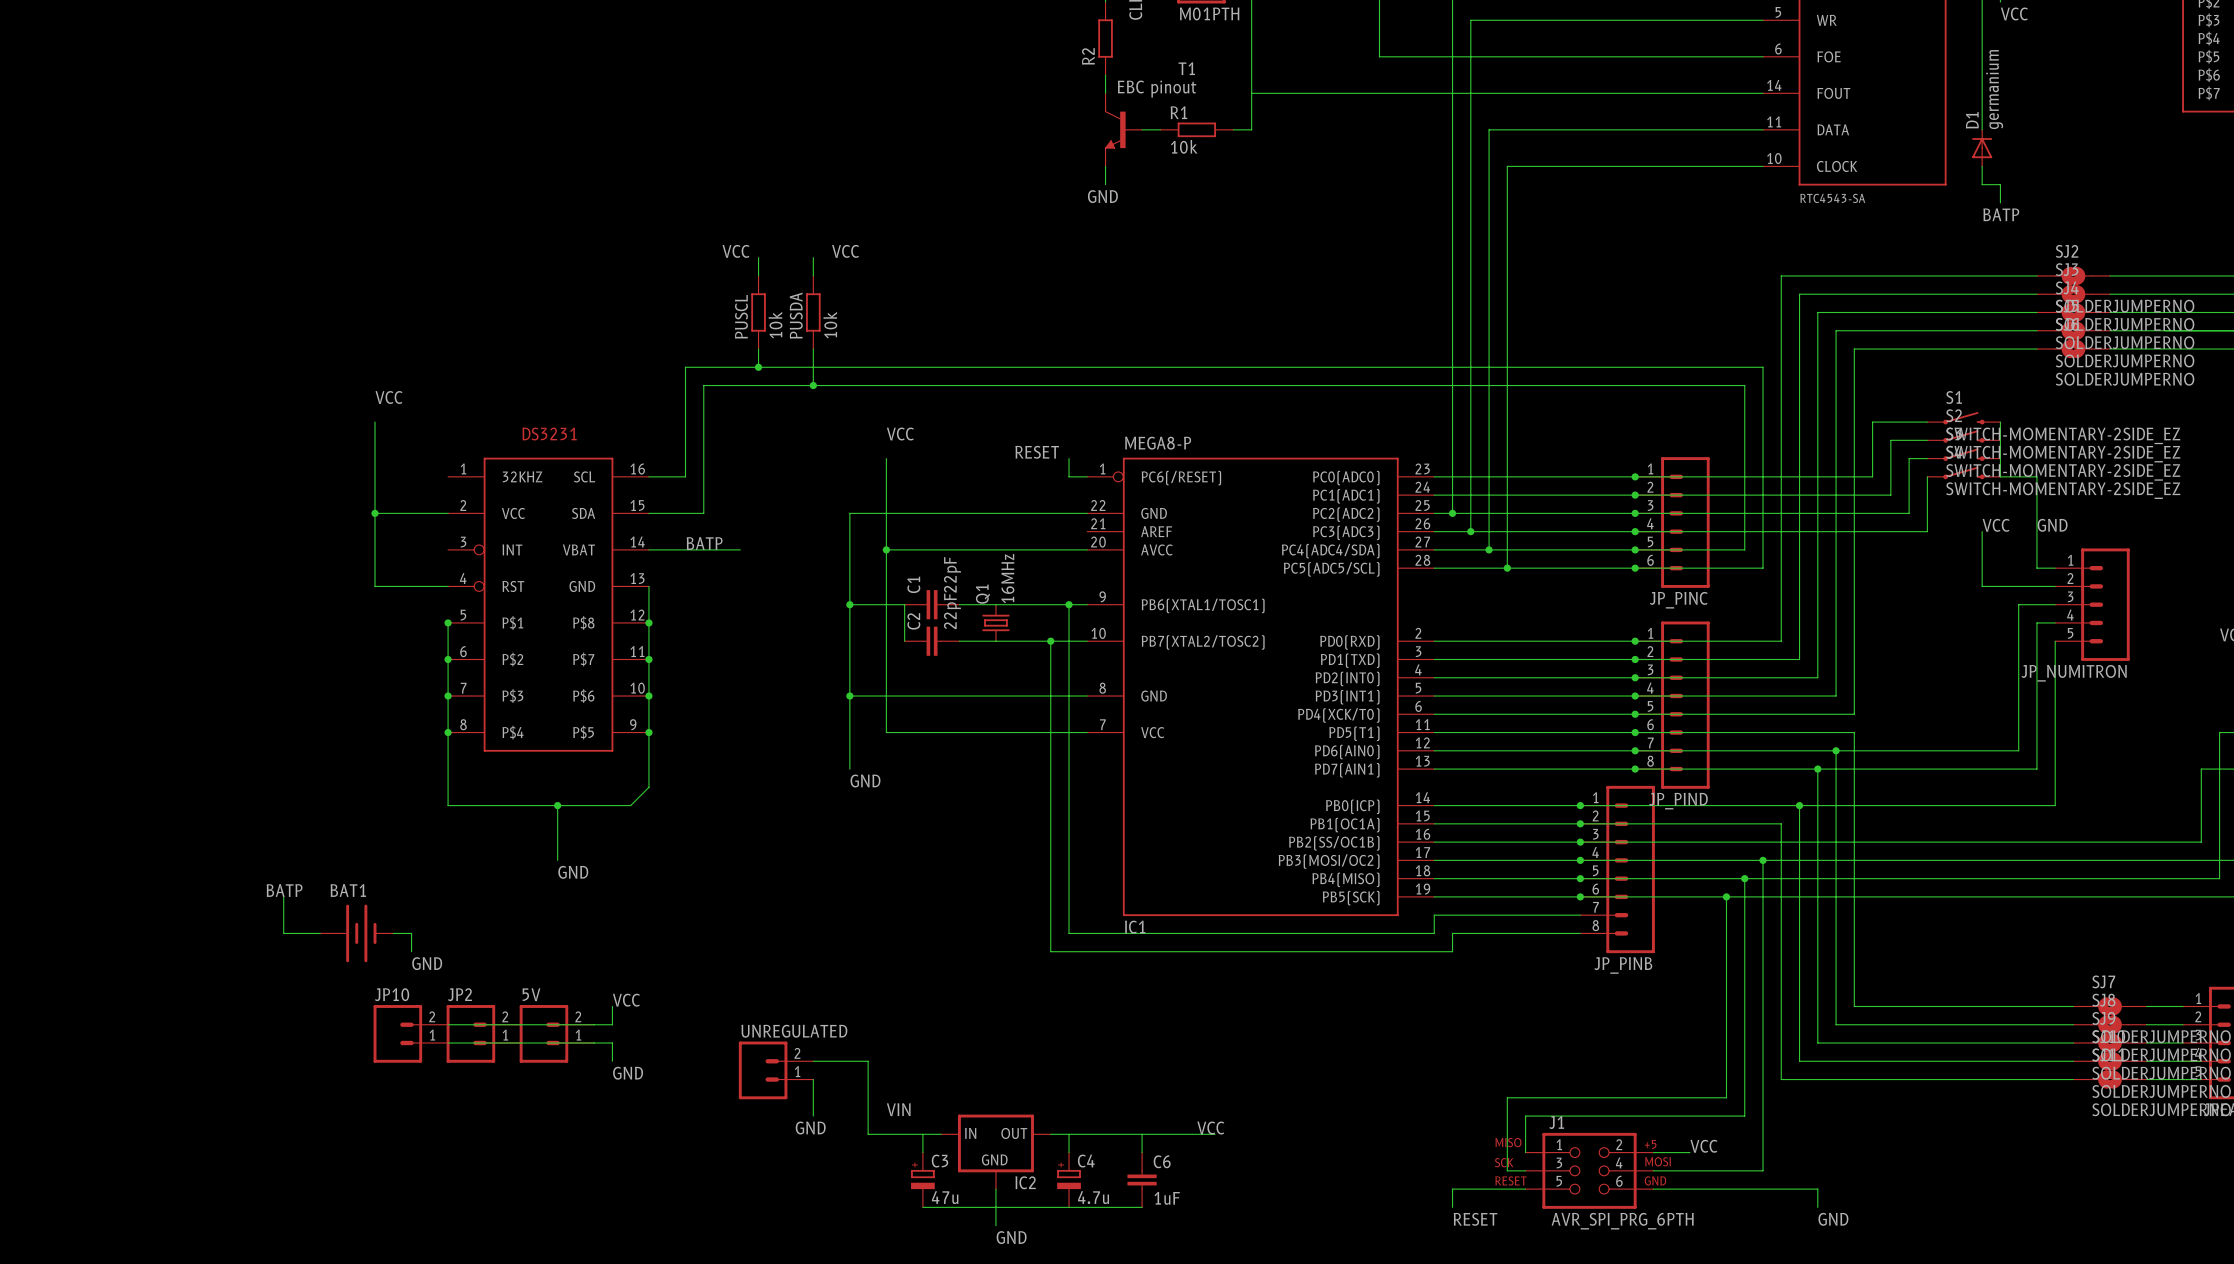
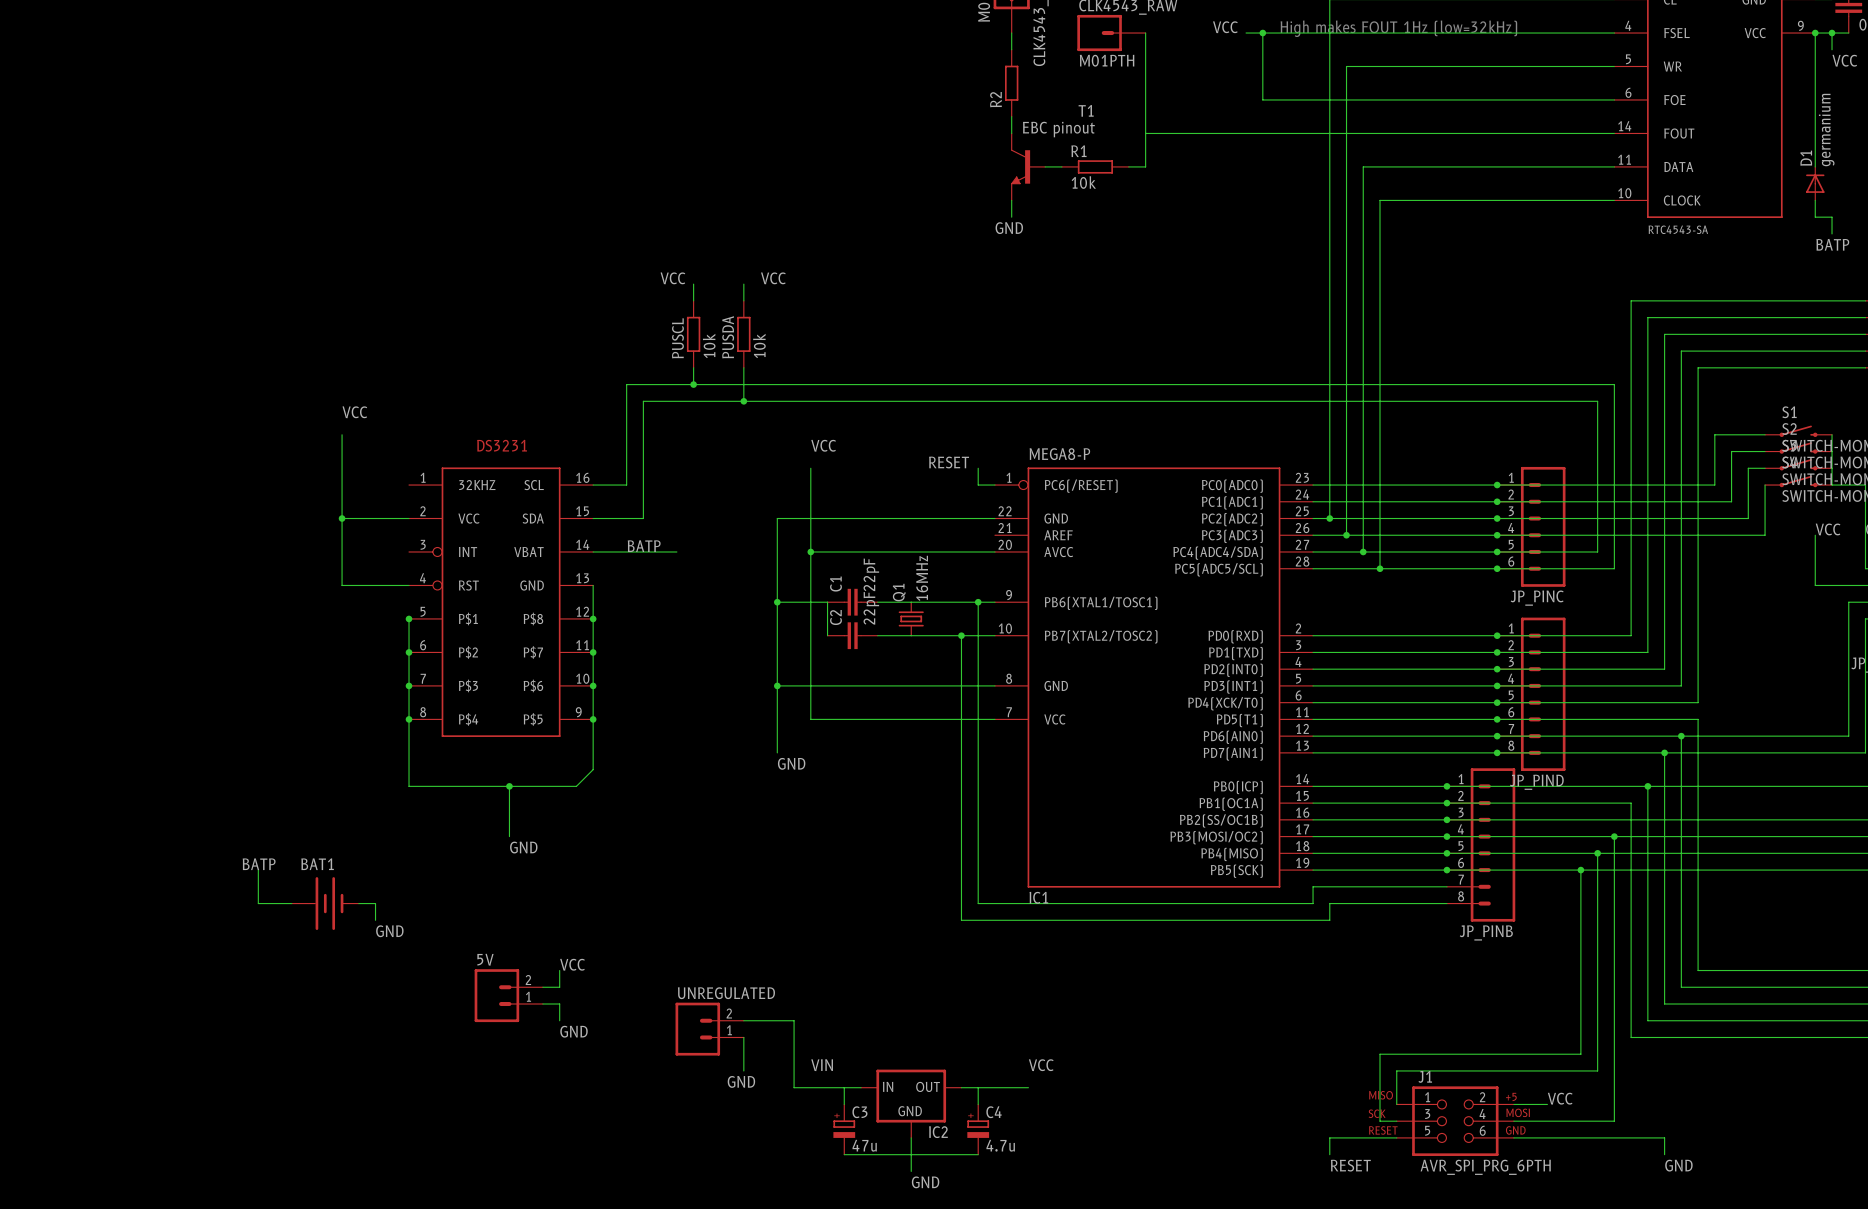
wire: (448, 1024) (594, 1024) -> none
JP10: (410, 1033) -> none
JP2: (483, 1033) -> none
wire: (448, 1043) (594, 1043) -> none
label position: VCC (1210, 1128) -> VCC (1041, 1065)
wire: (1123, 1134) (1215, 1134) -> none
wire: (1142, 1134) (1142, 1152) -> none
C6: 1uF (1142, 1179) -> none
wire: (1069, 1207) (1142, 1207) -> none

